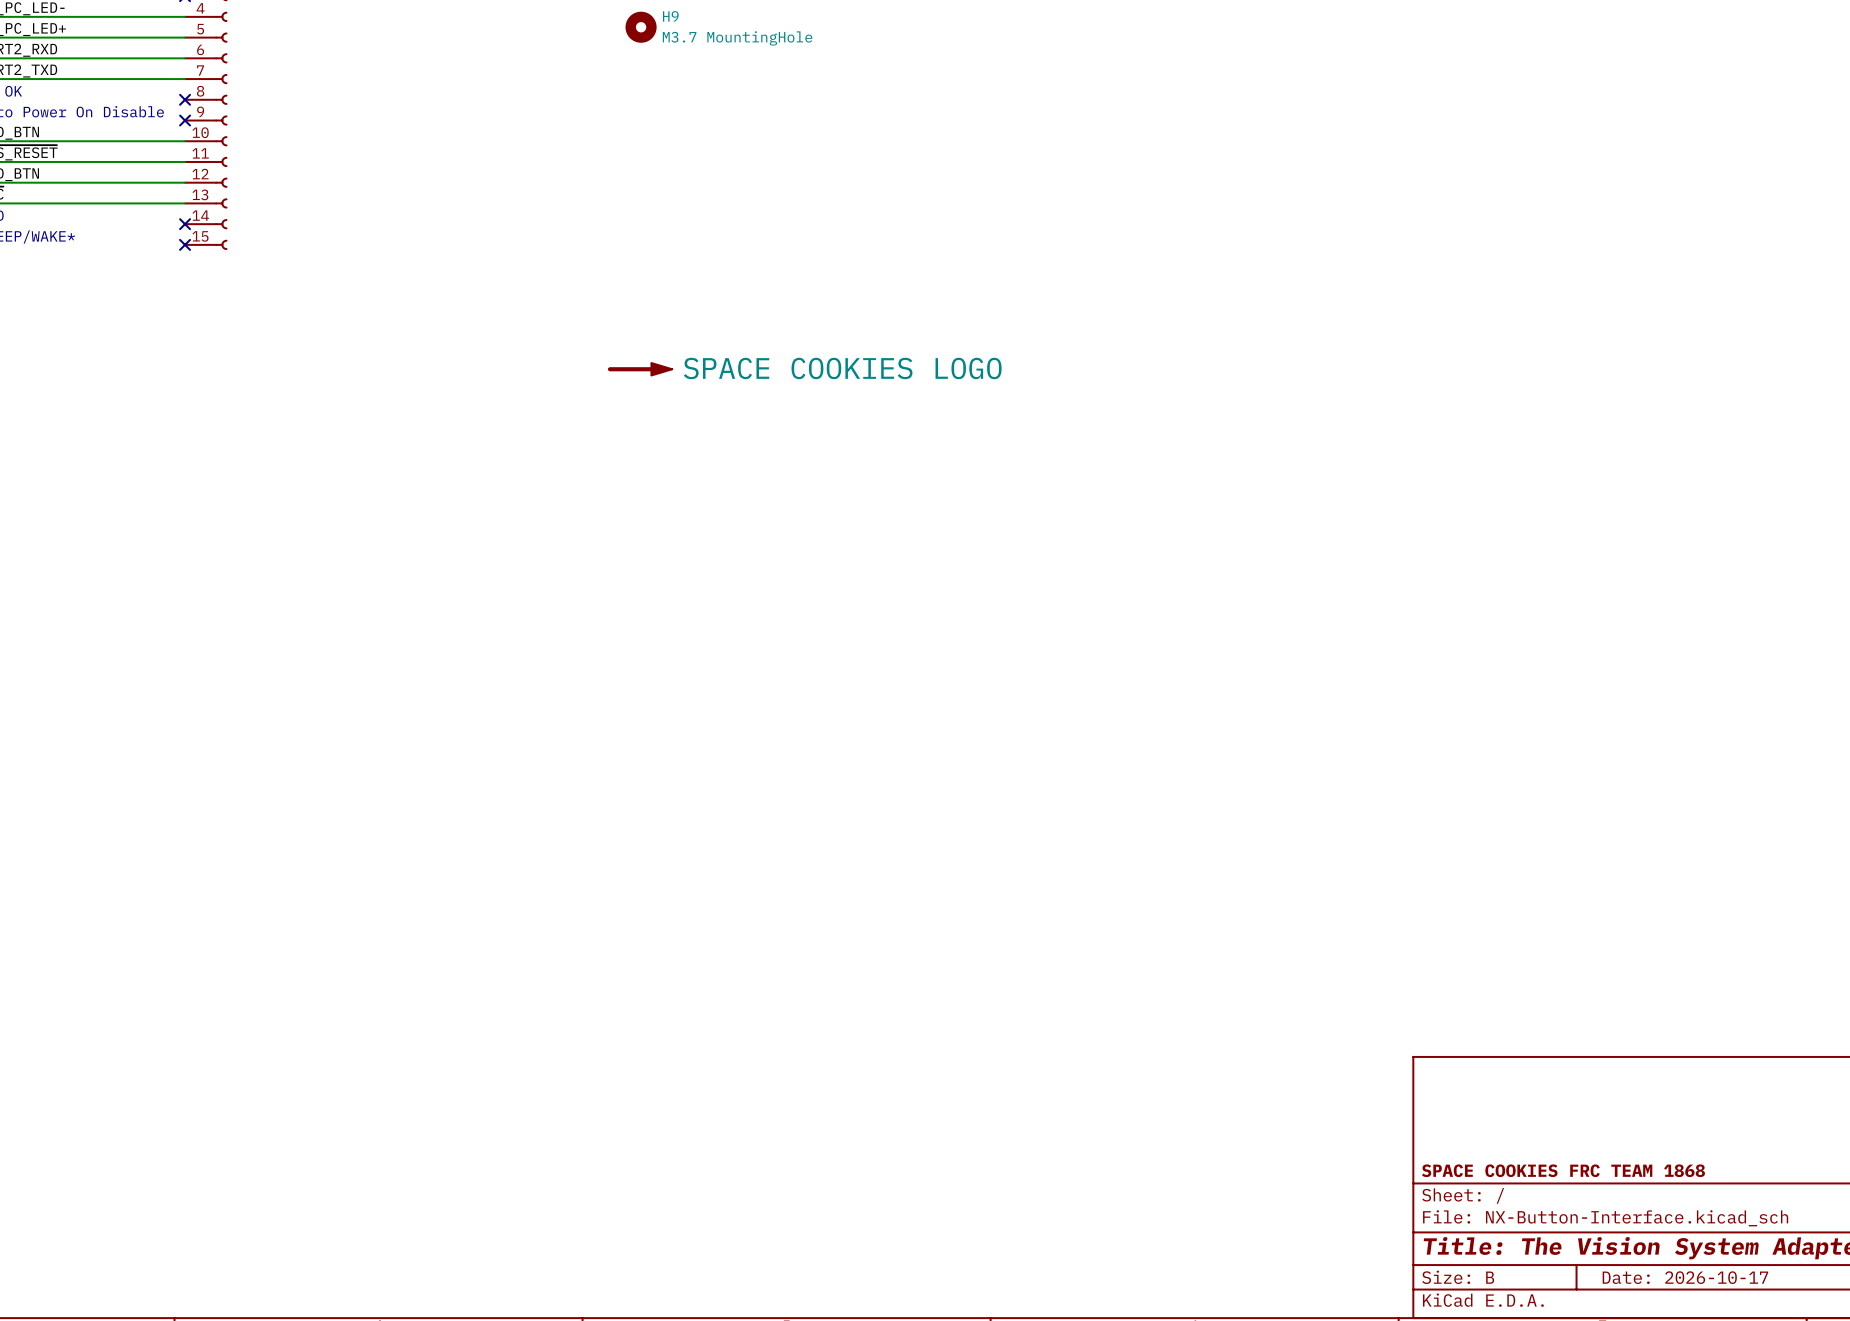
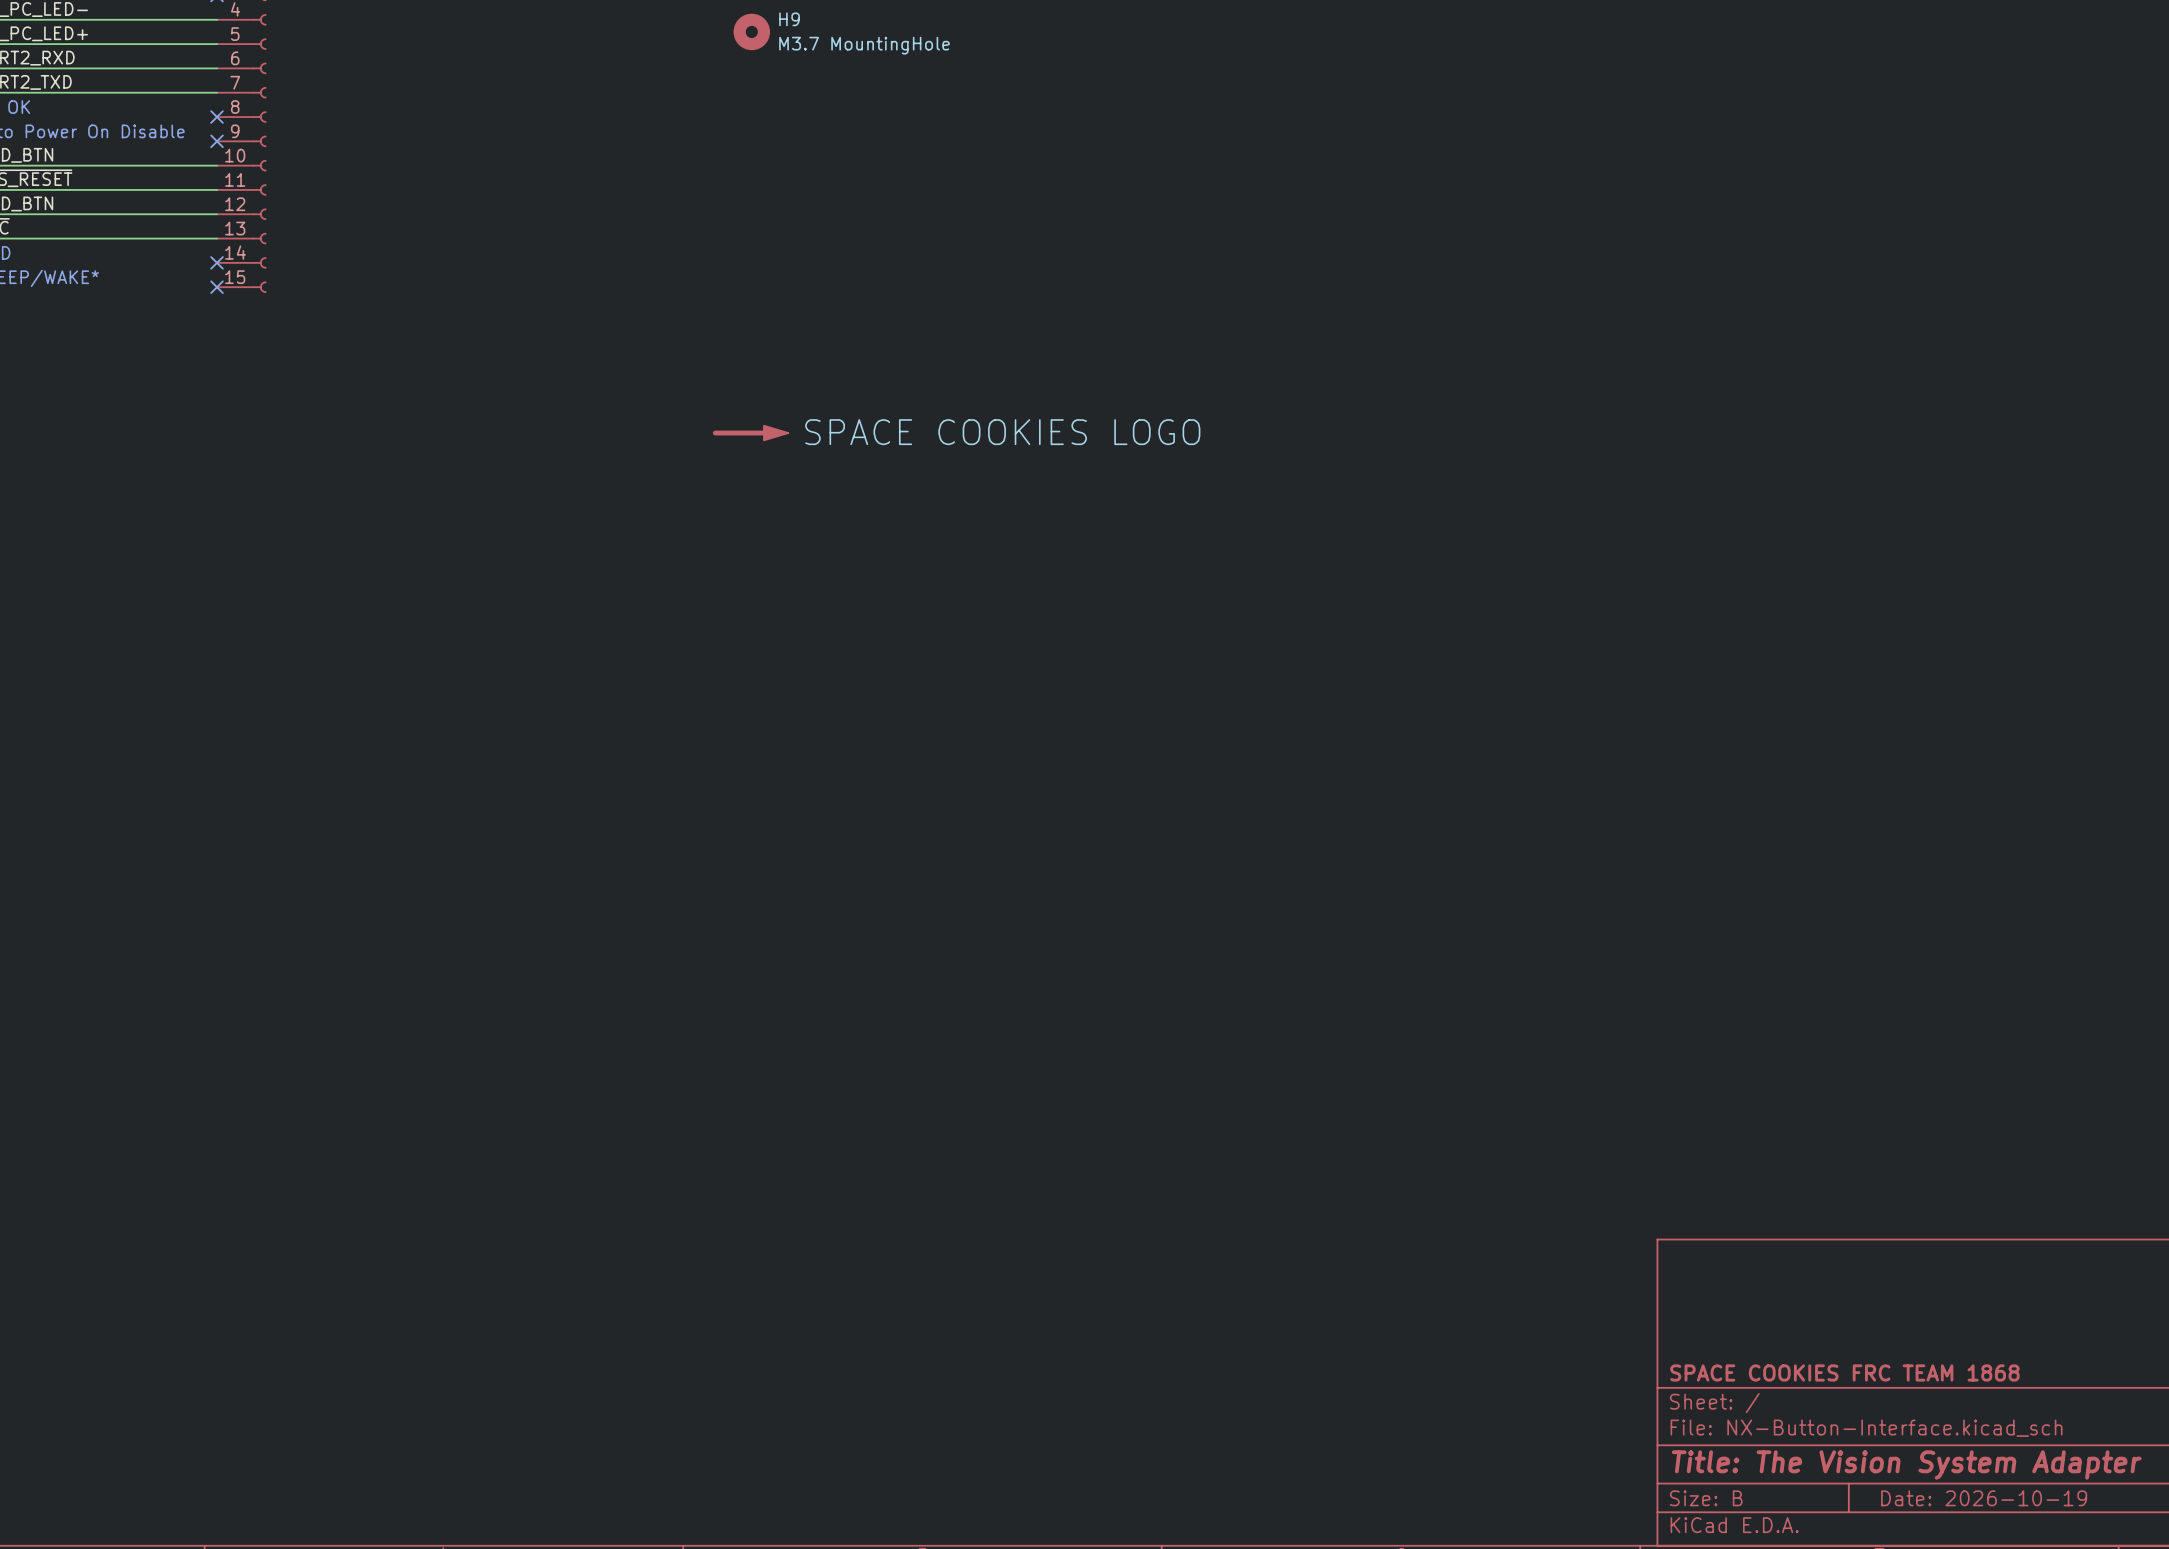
title block: Date: 2026-10-17 (1685, 1277) -> Date: 2026-10-19 (1984, 1498)

